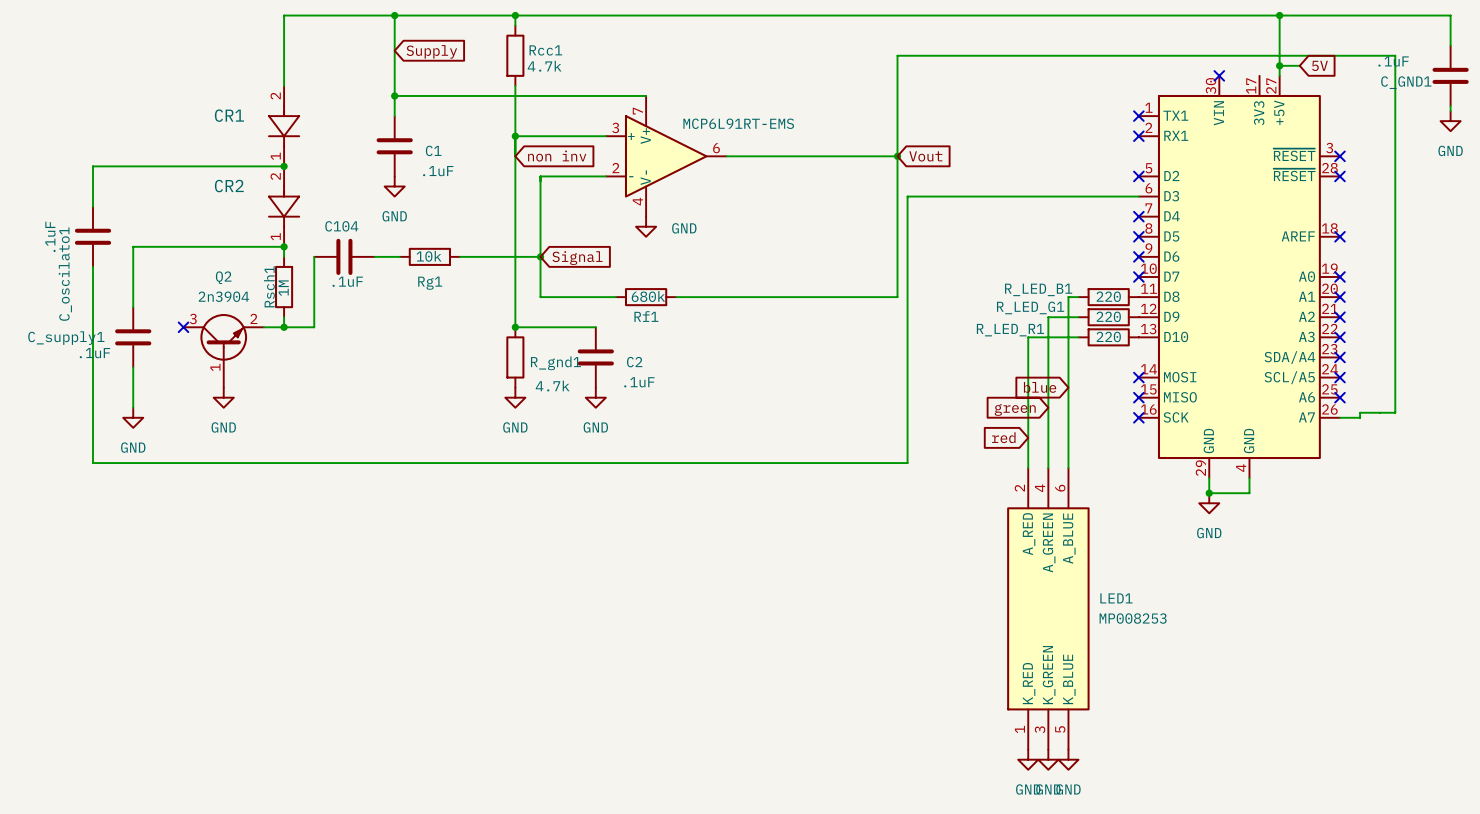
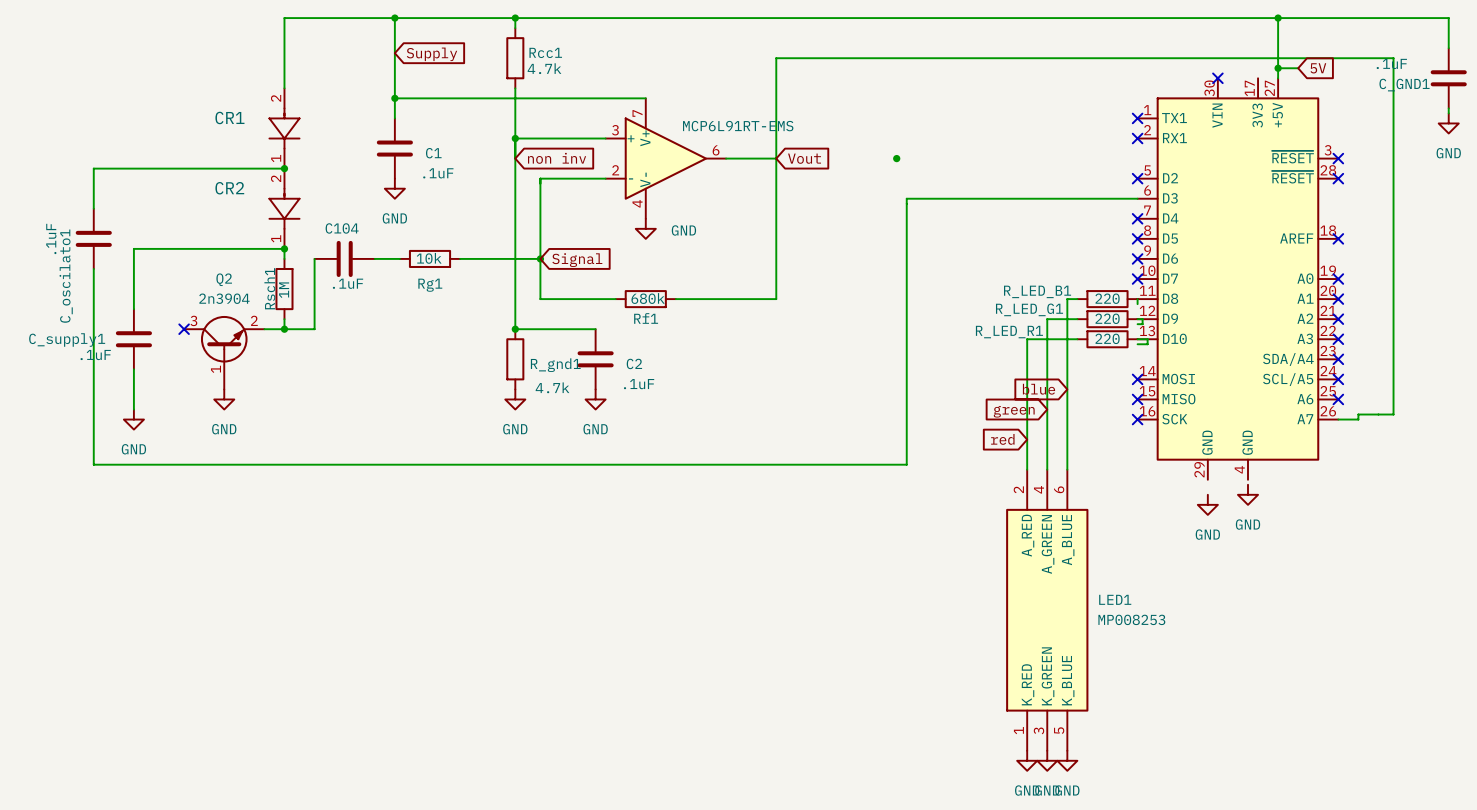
wire: (897, 55) (897, 297) (776, 297) -> (896, 58) (776, 58) (776, 299)
wire: (776, 156) (897, 156) -> none
global label position: Vout (925, 156) -> Vout (804, 158)
wire: none -> (1137, 299) (1137, 304)
wire: none -> (1137, 319) (1142, 319) (1142, 324) (1137, 324)
wire: none -> (1137, 339) (1147, 339) (1147, 344) (1137, 344)
wire: (1209, 478) (1209, 493) (1249, 493) (1249, 478) -> none
junction: (1209, 493) -> none
power symbol: none -> GND (1248, 494)

